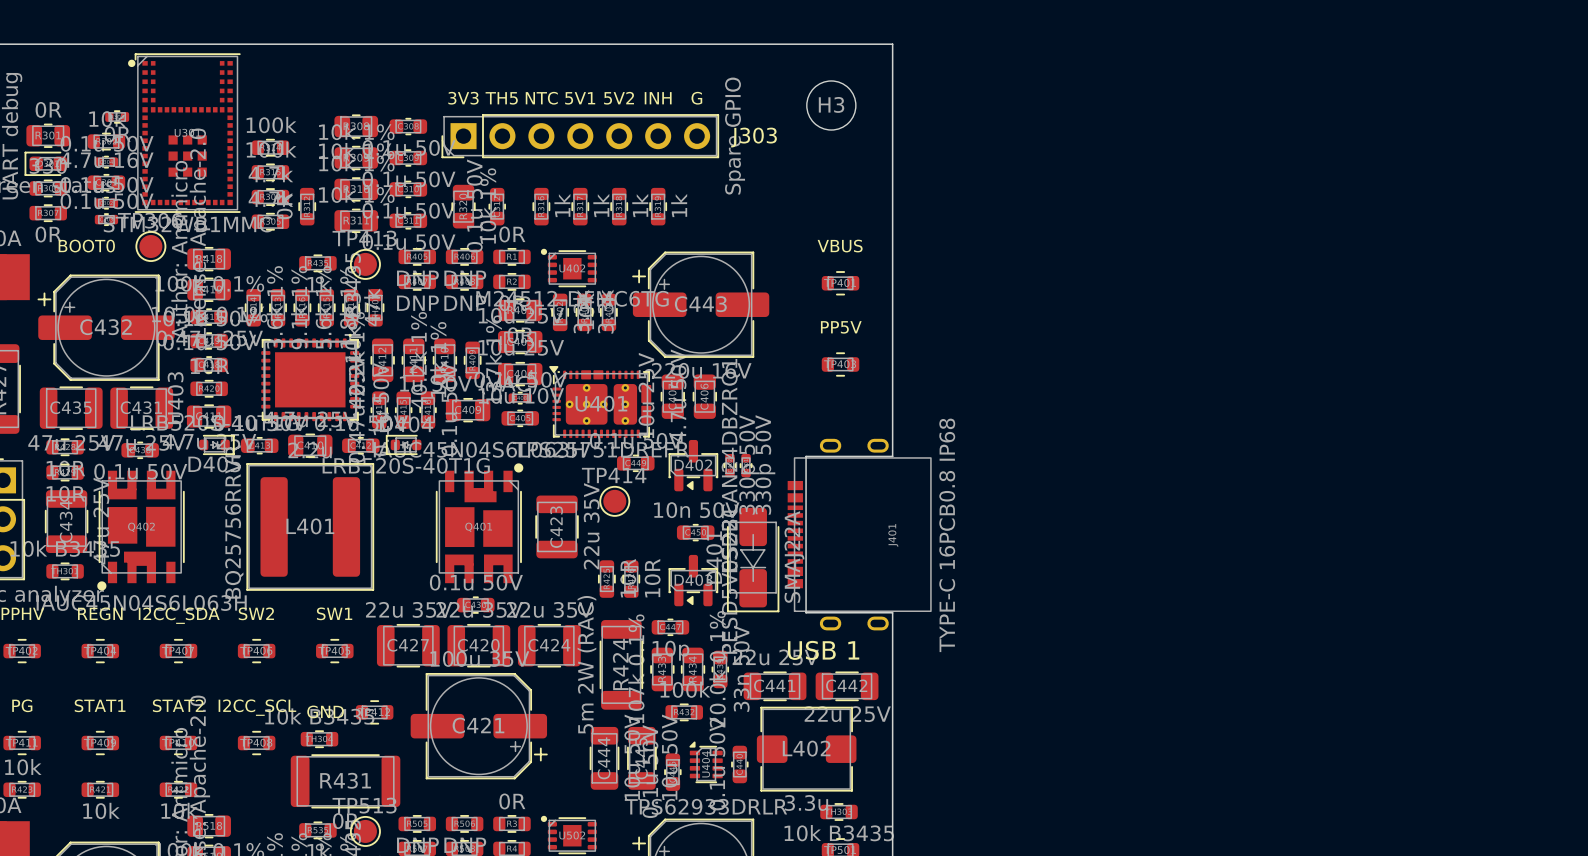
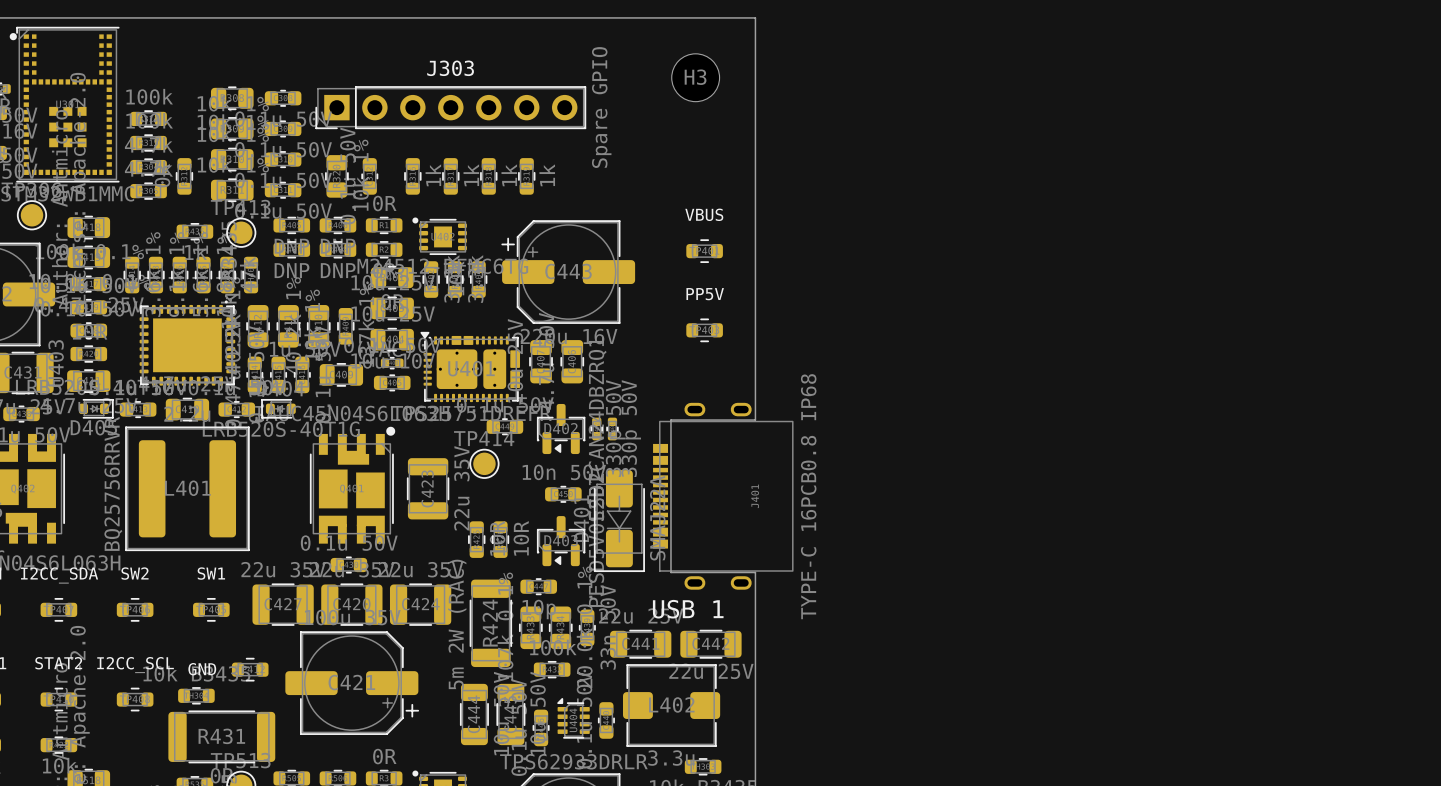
text: 3V3 (463, 98) -> none
text: TH5 (501, 98) -> none
text: NTC (541, 98) -> none
text: 5V1 (580, 98) -> none
text: 5V2 (619, 98) -> none
text: INH (658, 98) -> none
text: G (696, 98) -> none
J303 name position: J303 (754, 137) -> J303 (450, 68)

